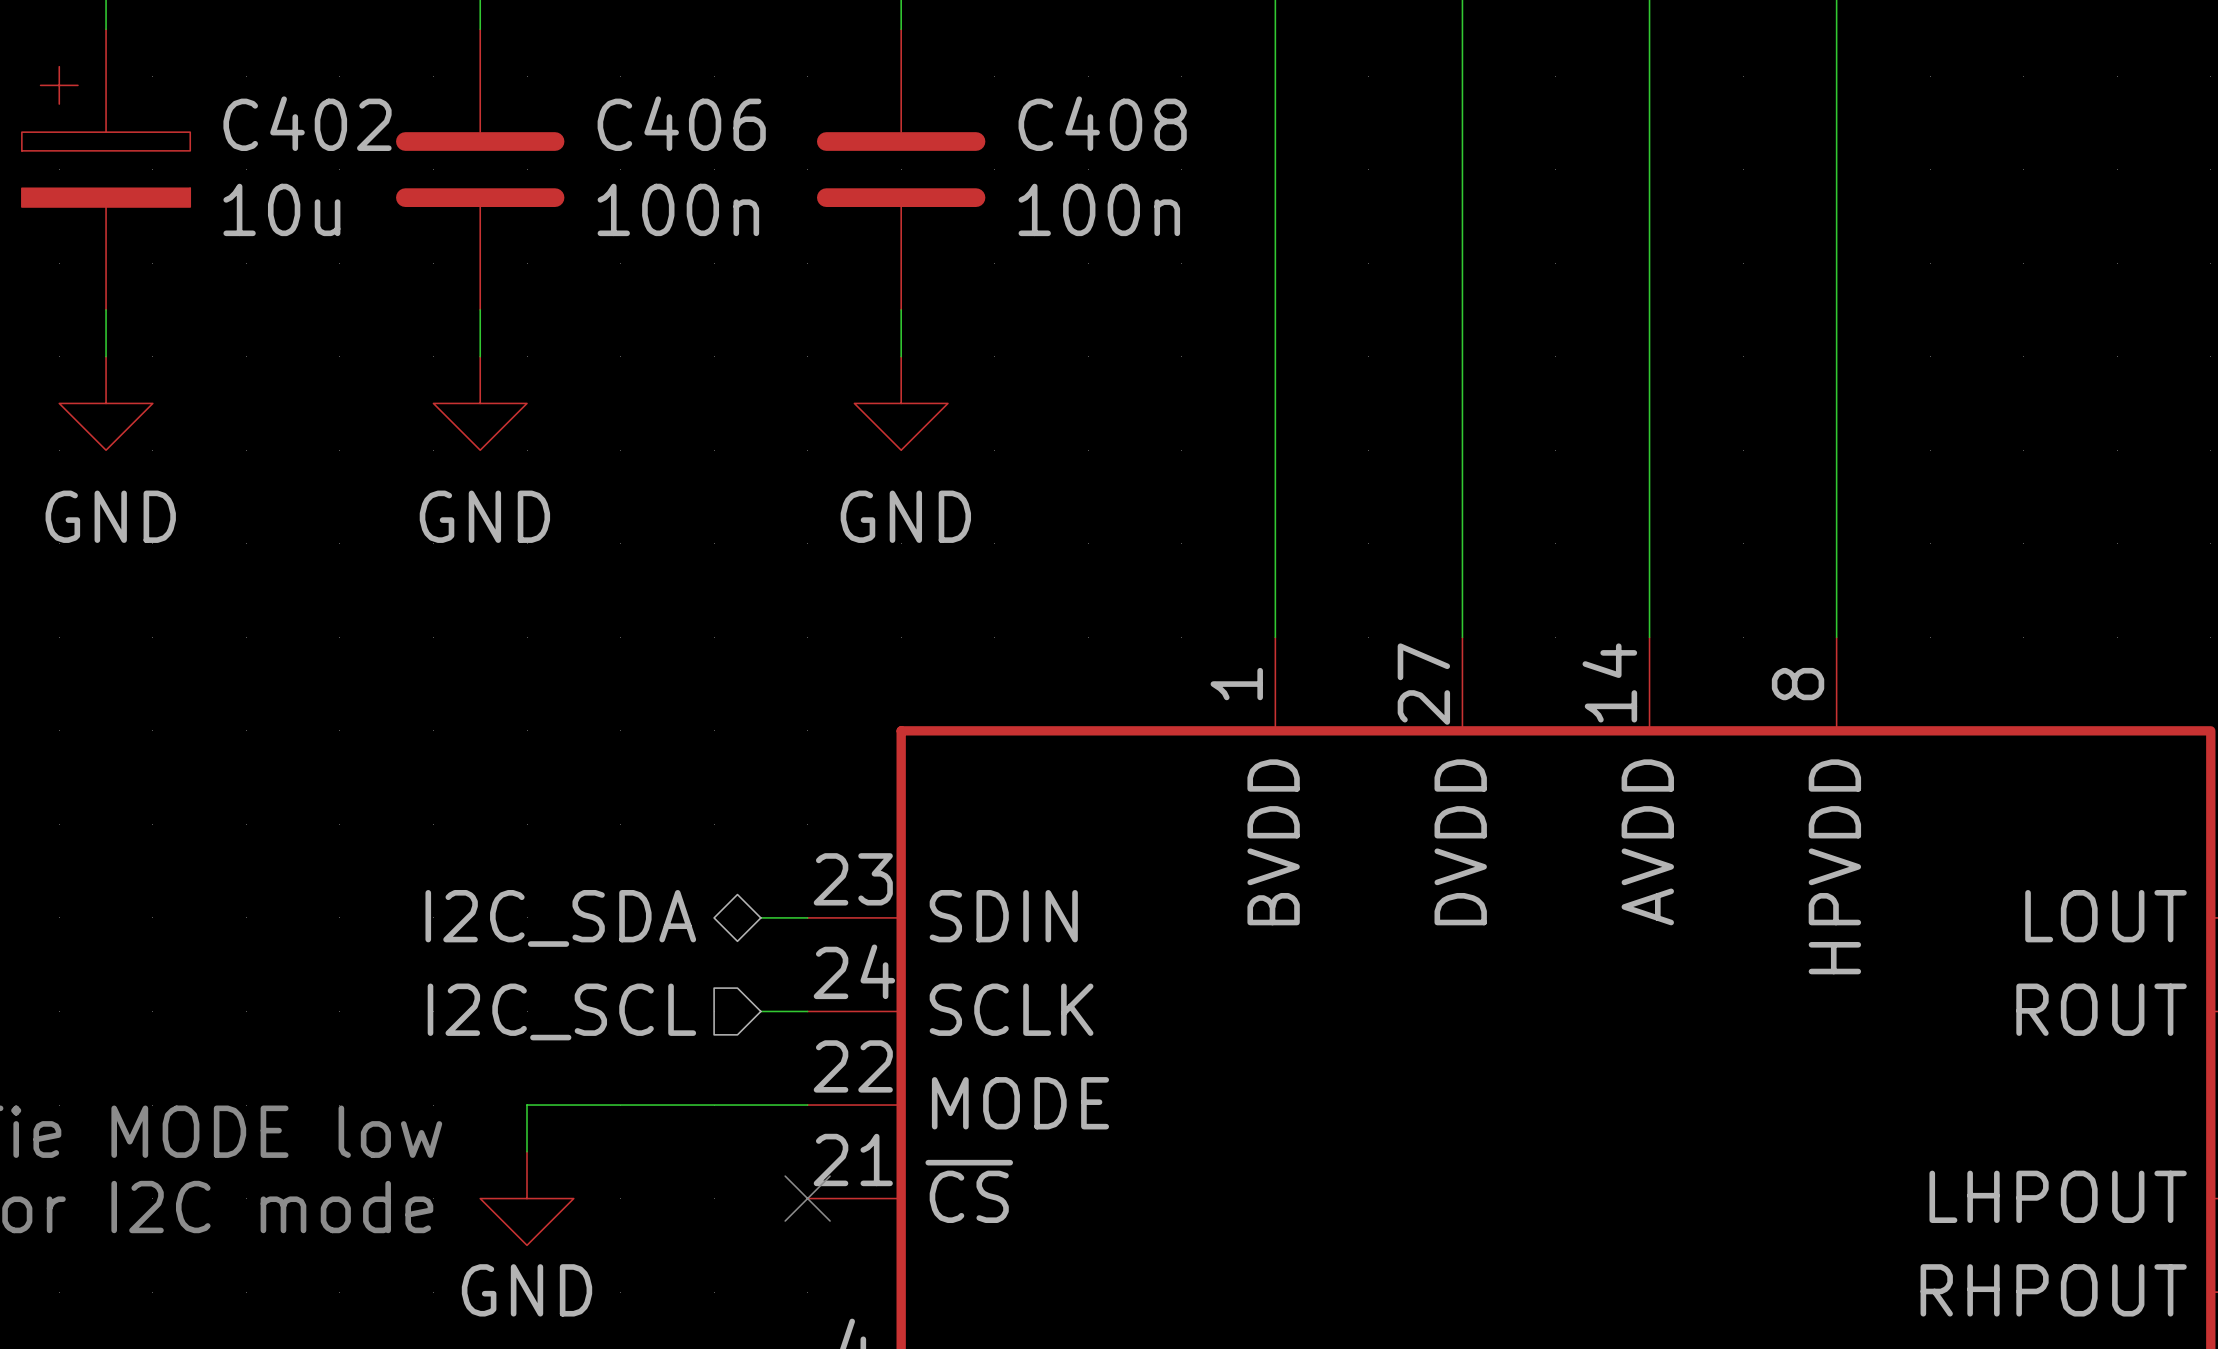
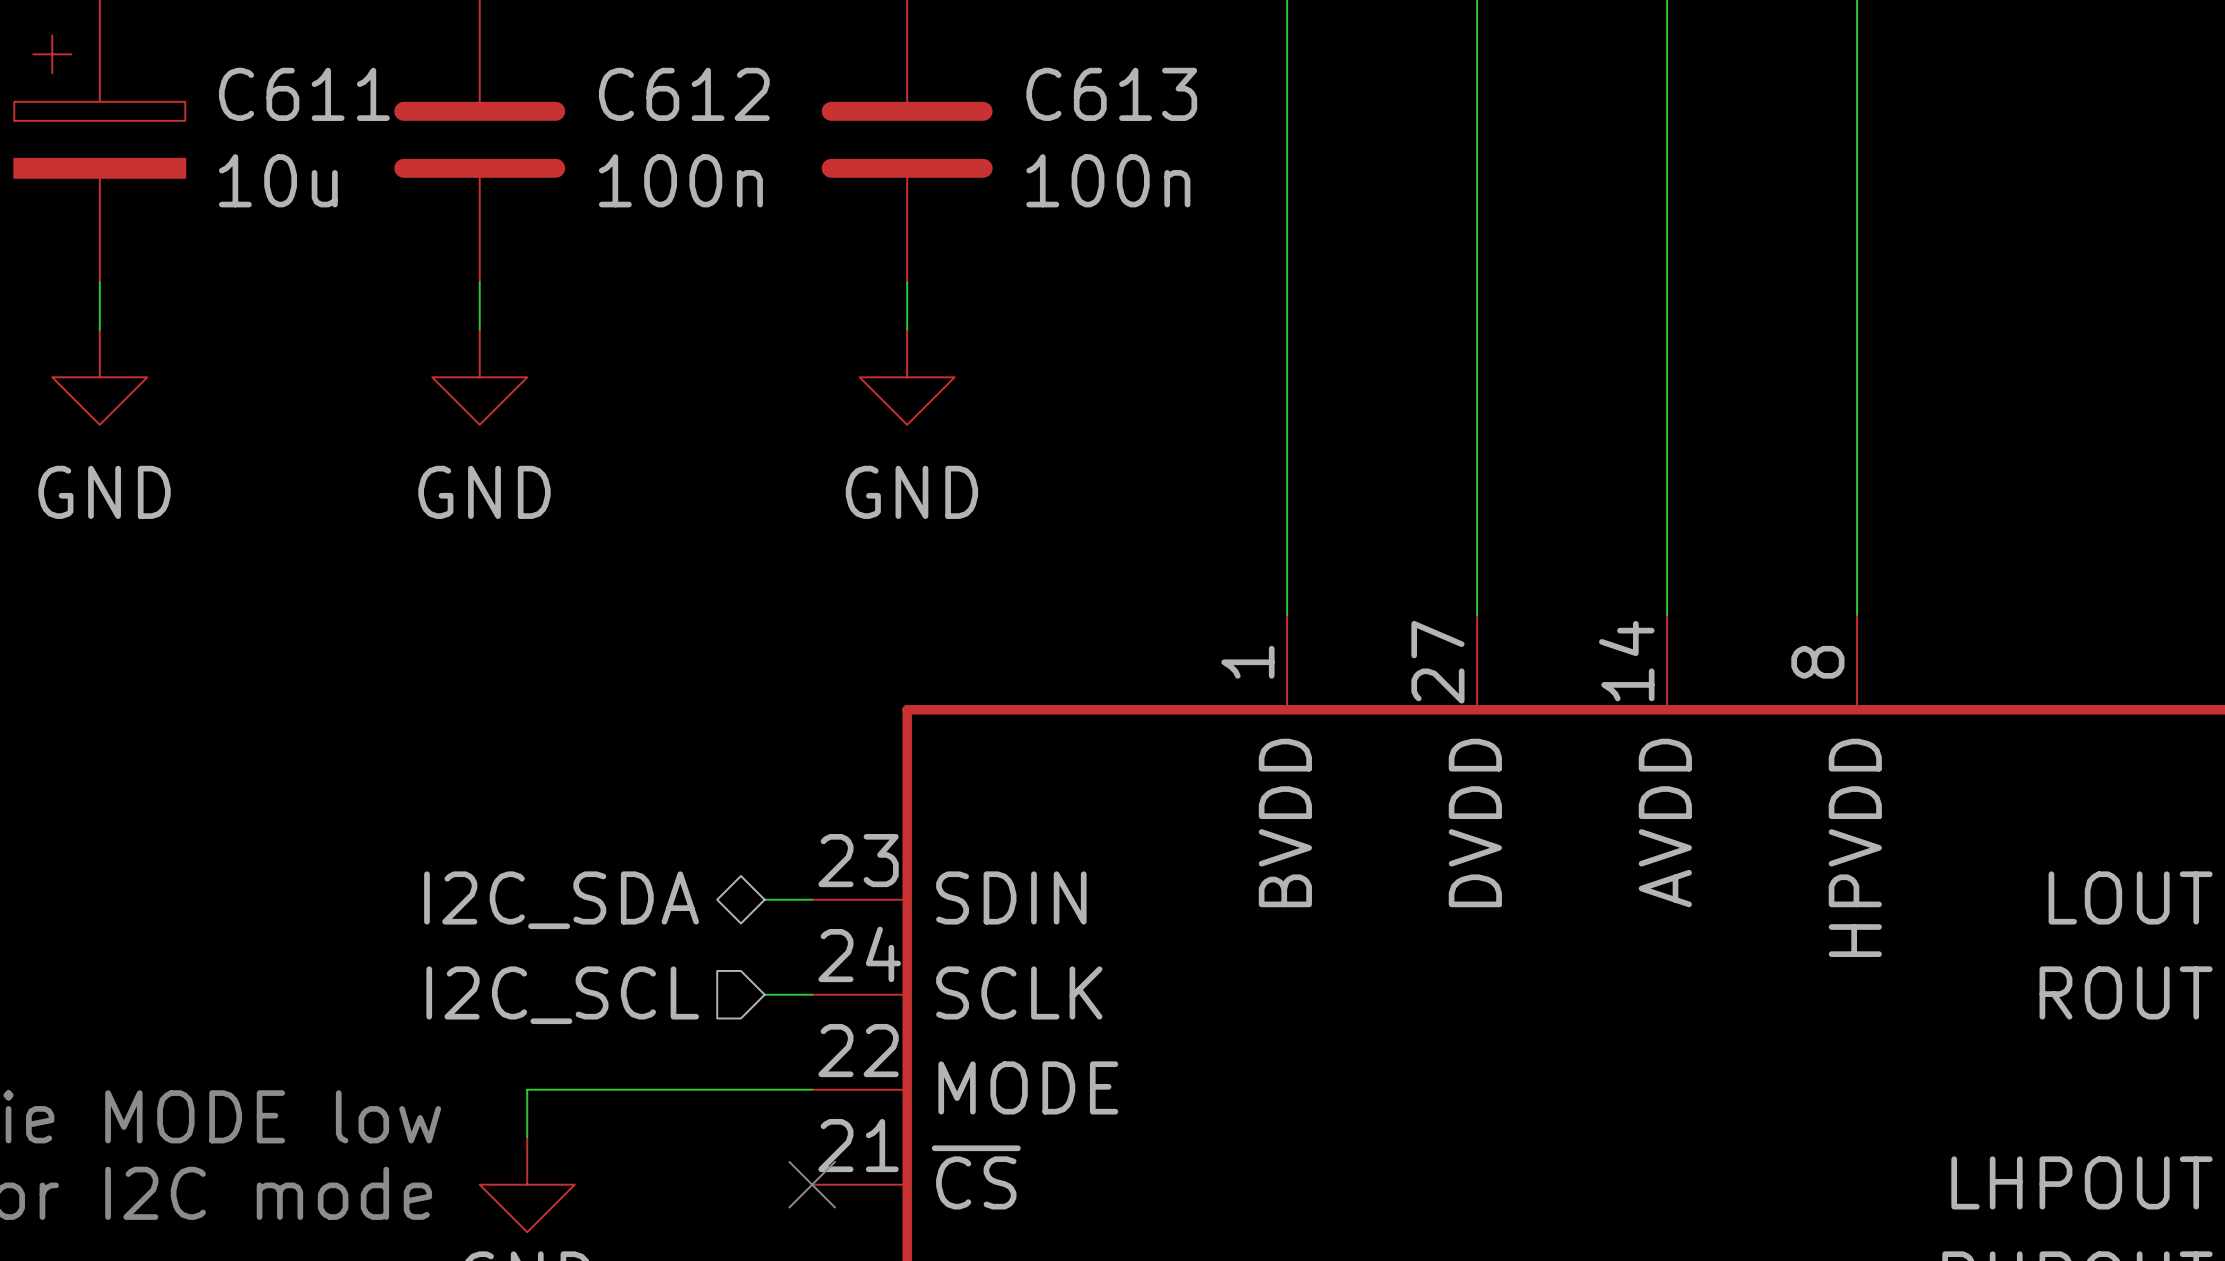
C402 name: C402 (307, 123) -> C611 (304, 94)
C406 name: C406 (681, 123) -> C612 (684, 94)
C408 name: C408 (1102, 123) -> C613 (1111, 94)

